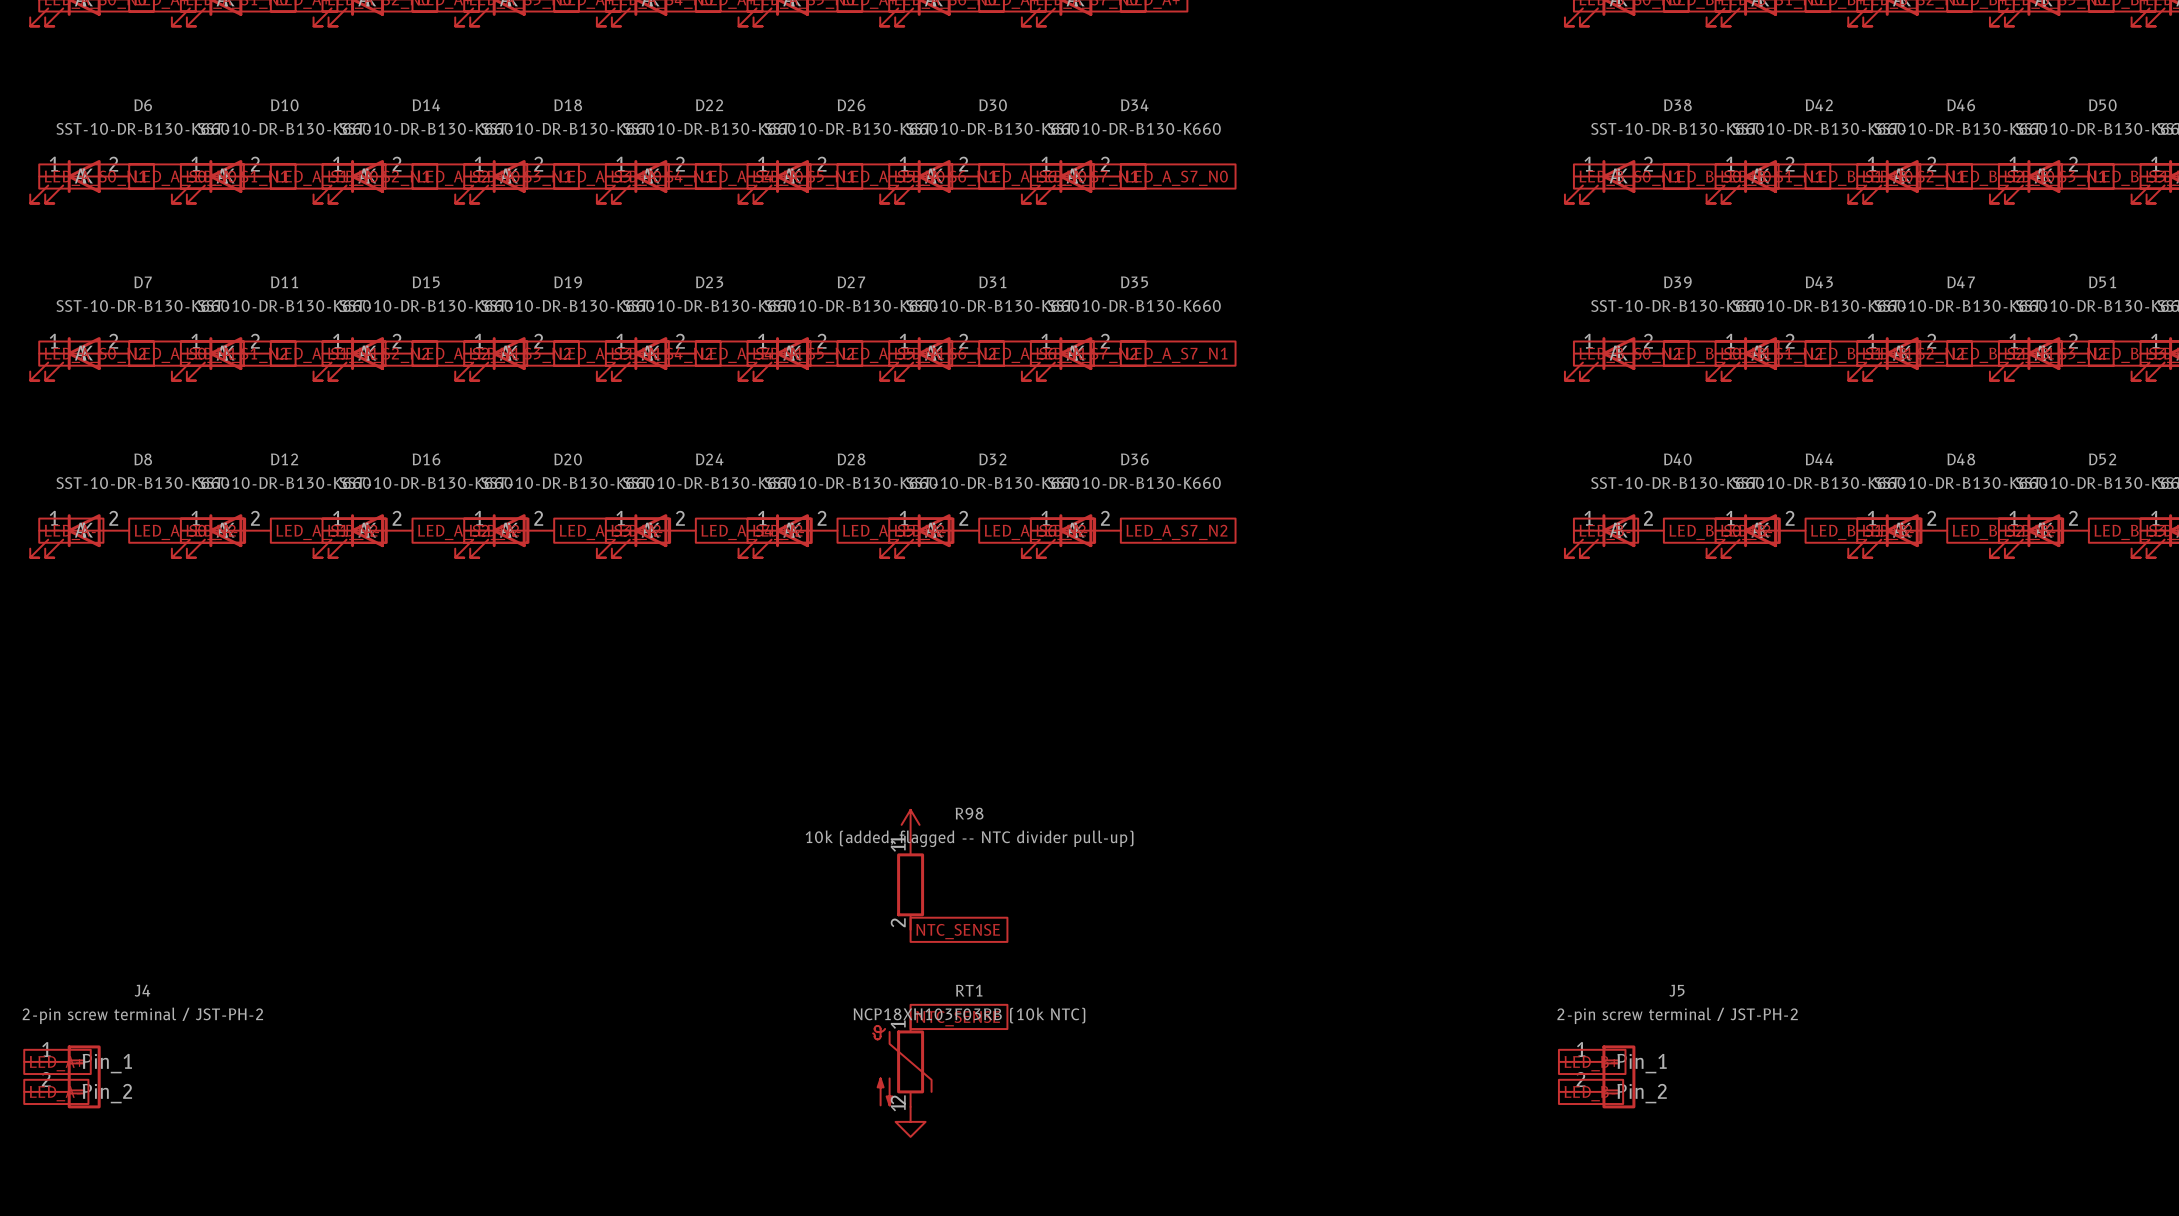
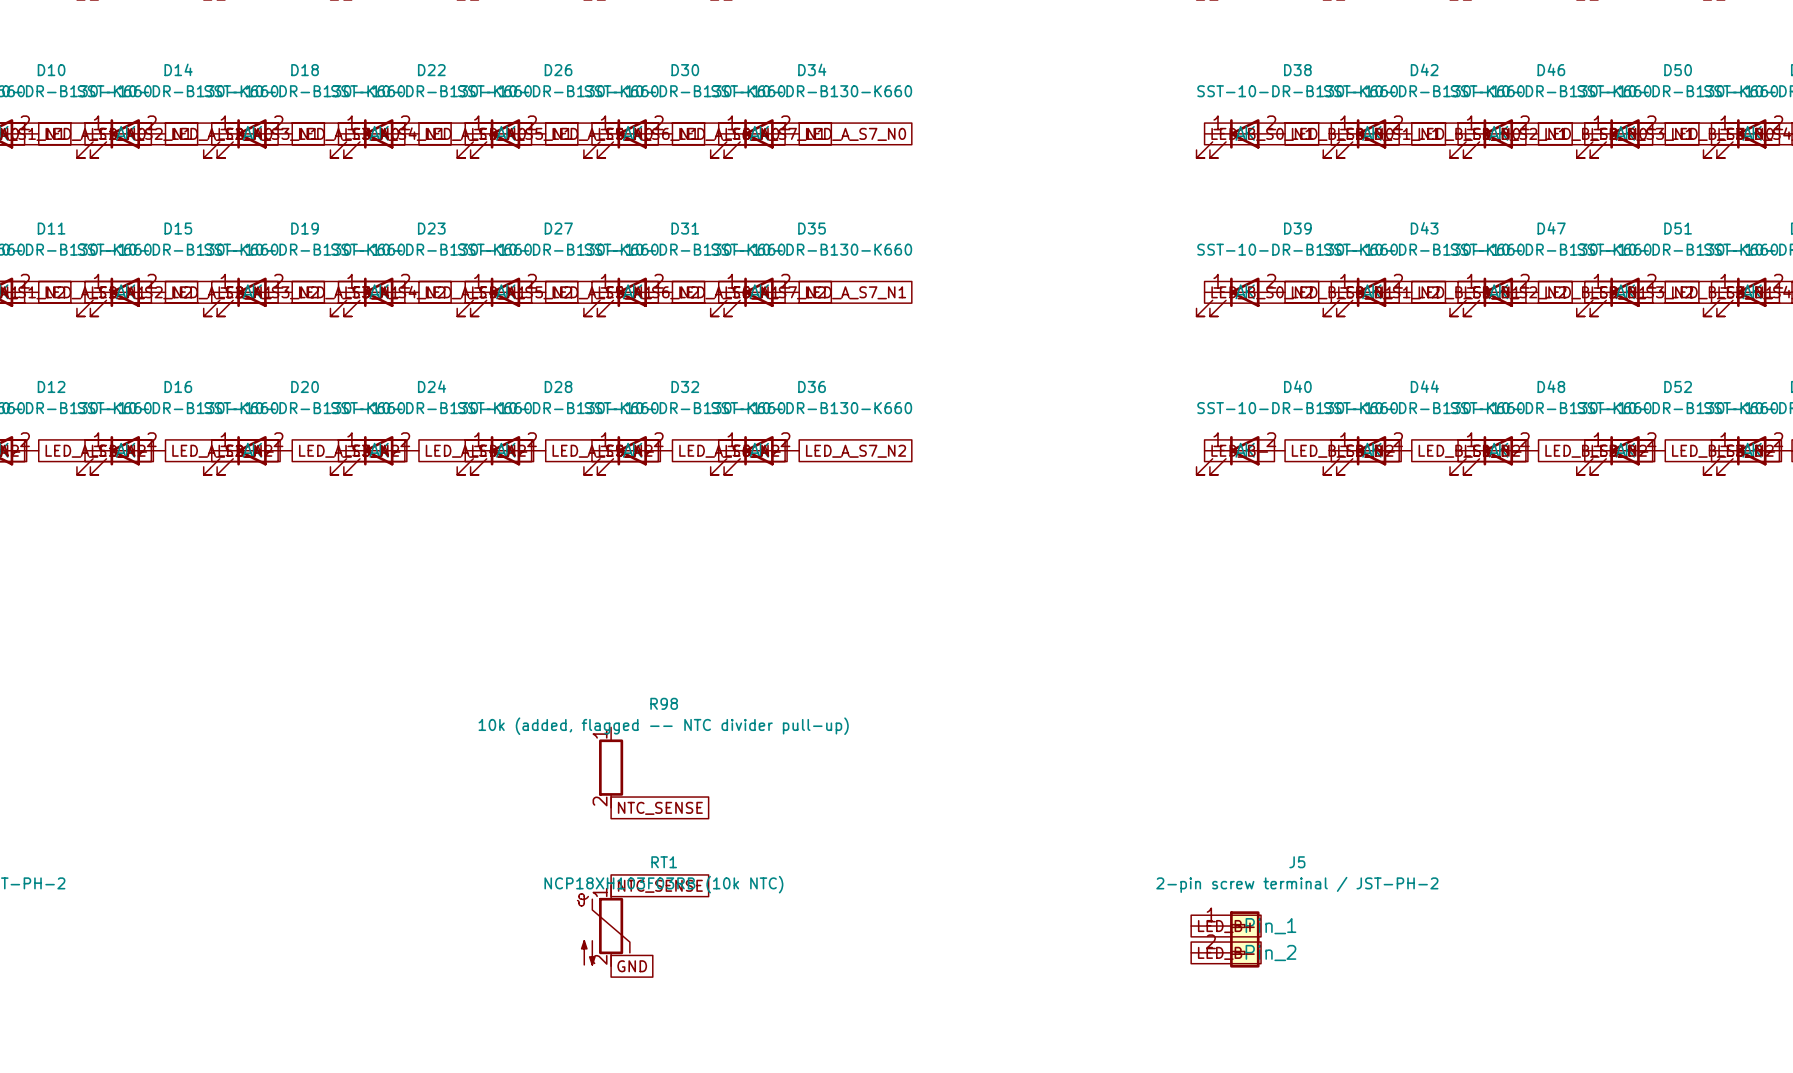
power symbol: (910, 824) -> none
global label: none -> GND (632, 966)
power symbol: (910, 1121) -> none

